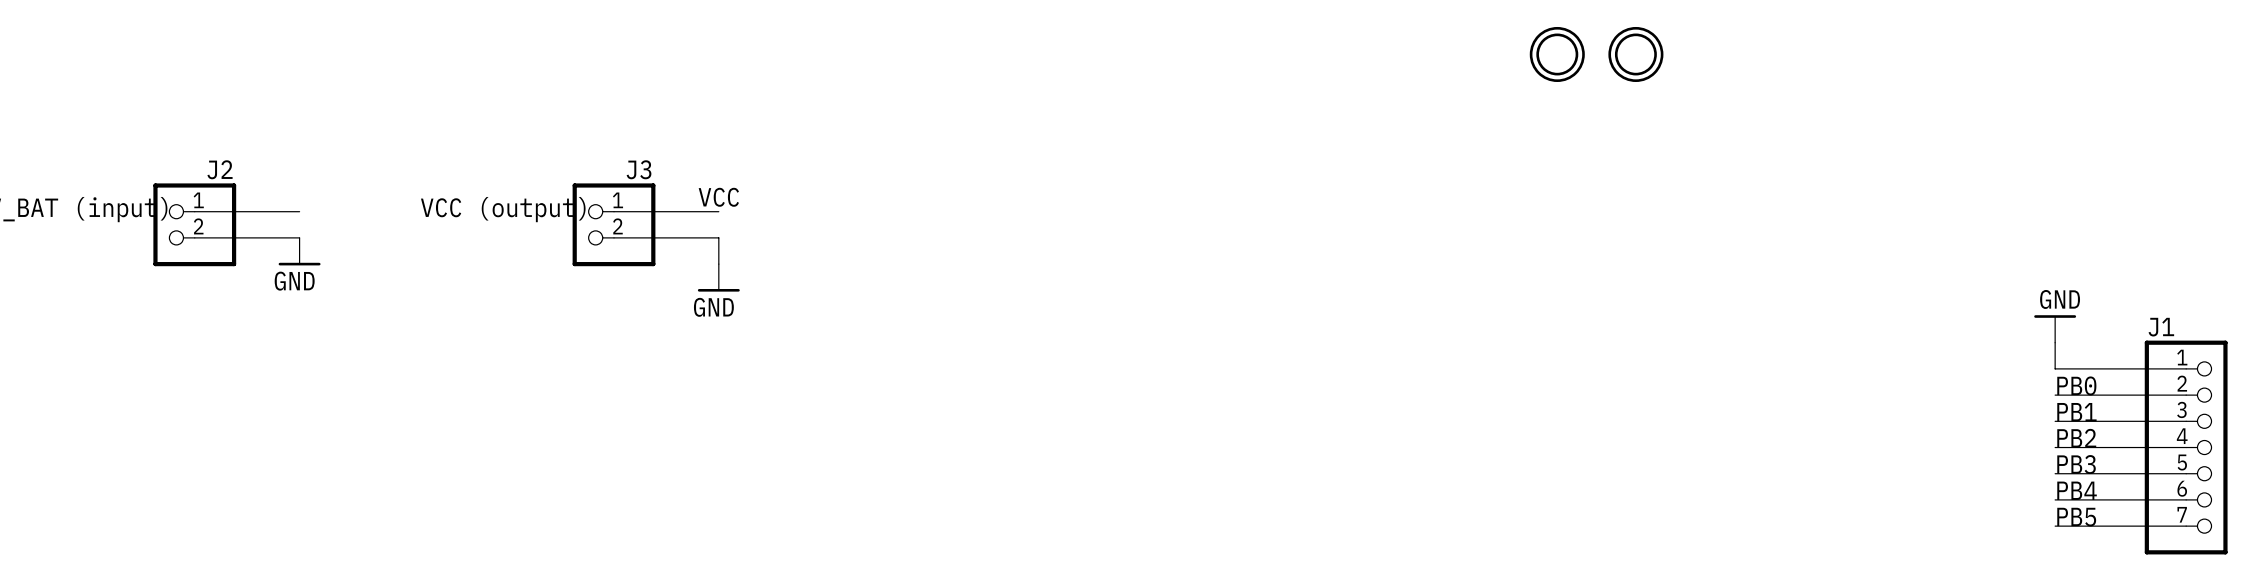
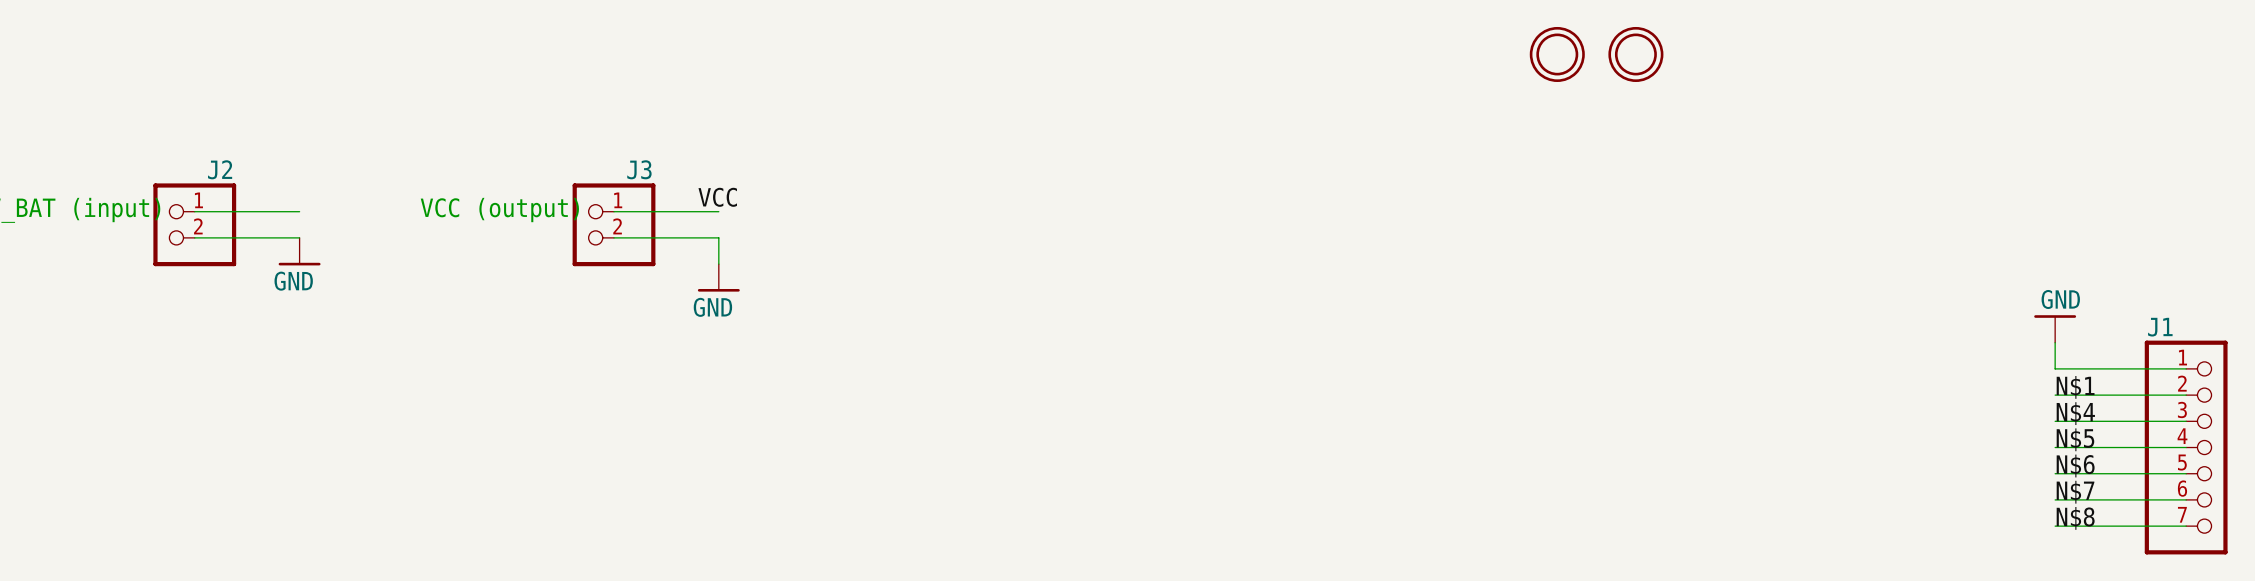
label: PB0 (2076, 385) -> N$1 (2075, 387)
label: PB1 (2076, 412) -> N$4 (2075, 413)
label: PB2 (2076, 438) -> N$5 (2075, 439)
label: PB3 (2076, 464) -> N$6 (2075, 466)
label: PB4 (2077, 490) -> N$7 (2075, 492)
label: PB5 (2076, 517) -> N$8 (2075, 518)

